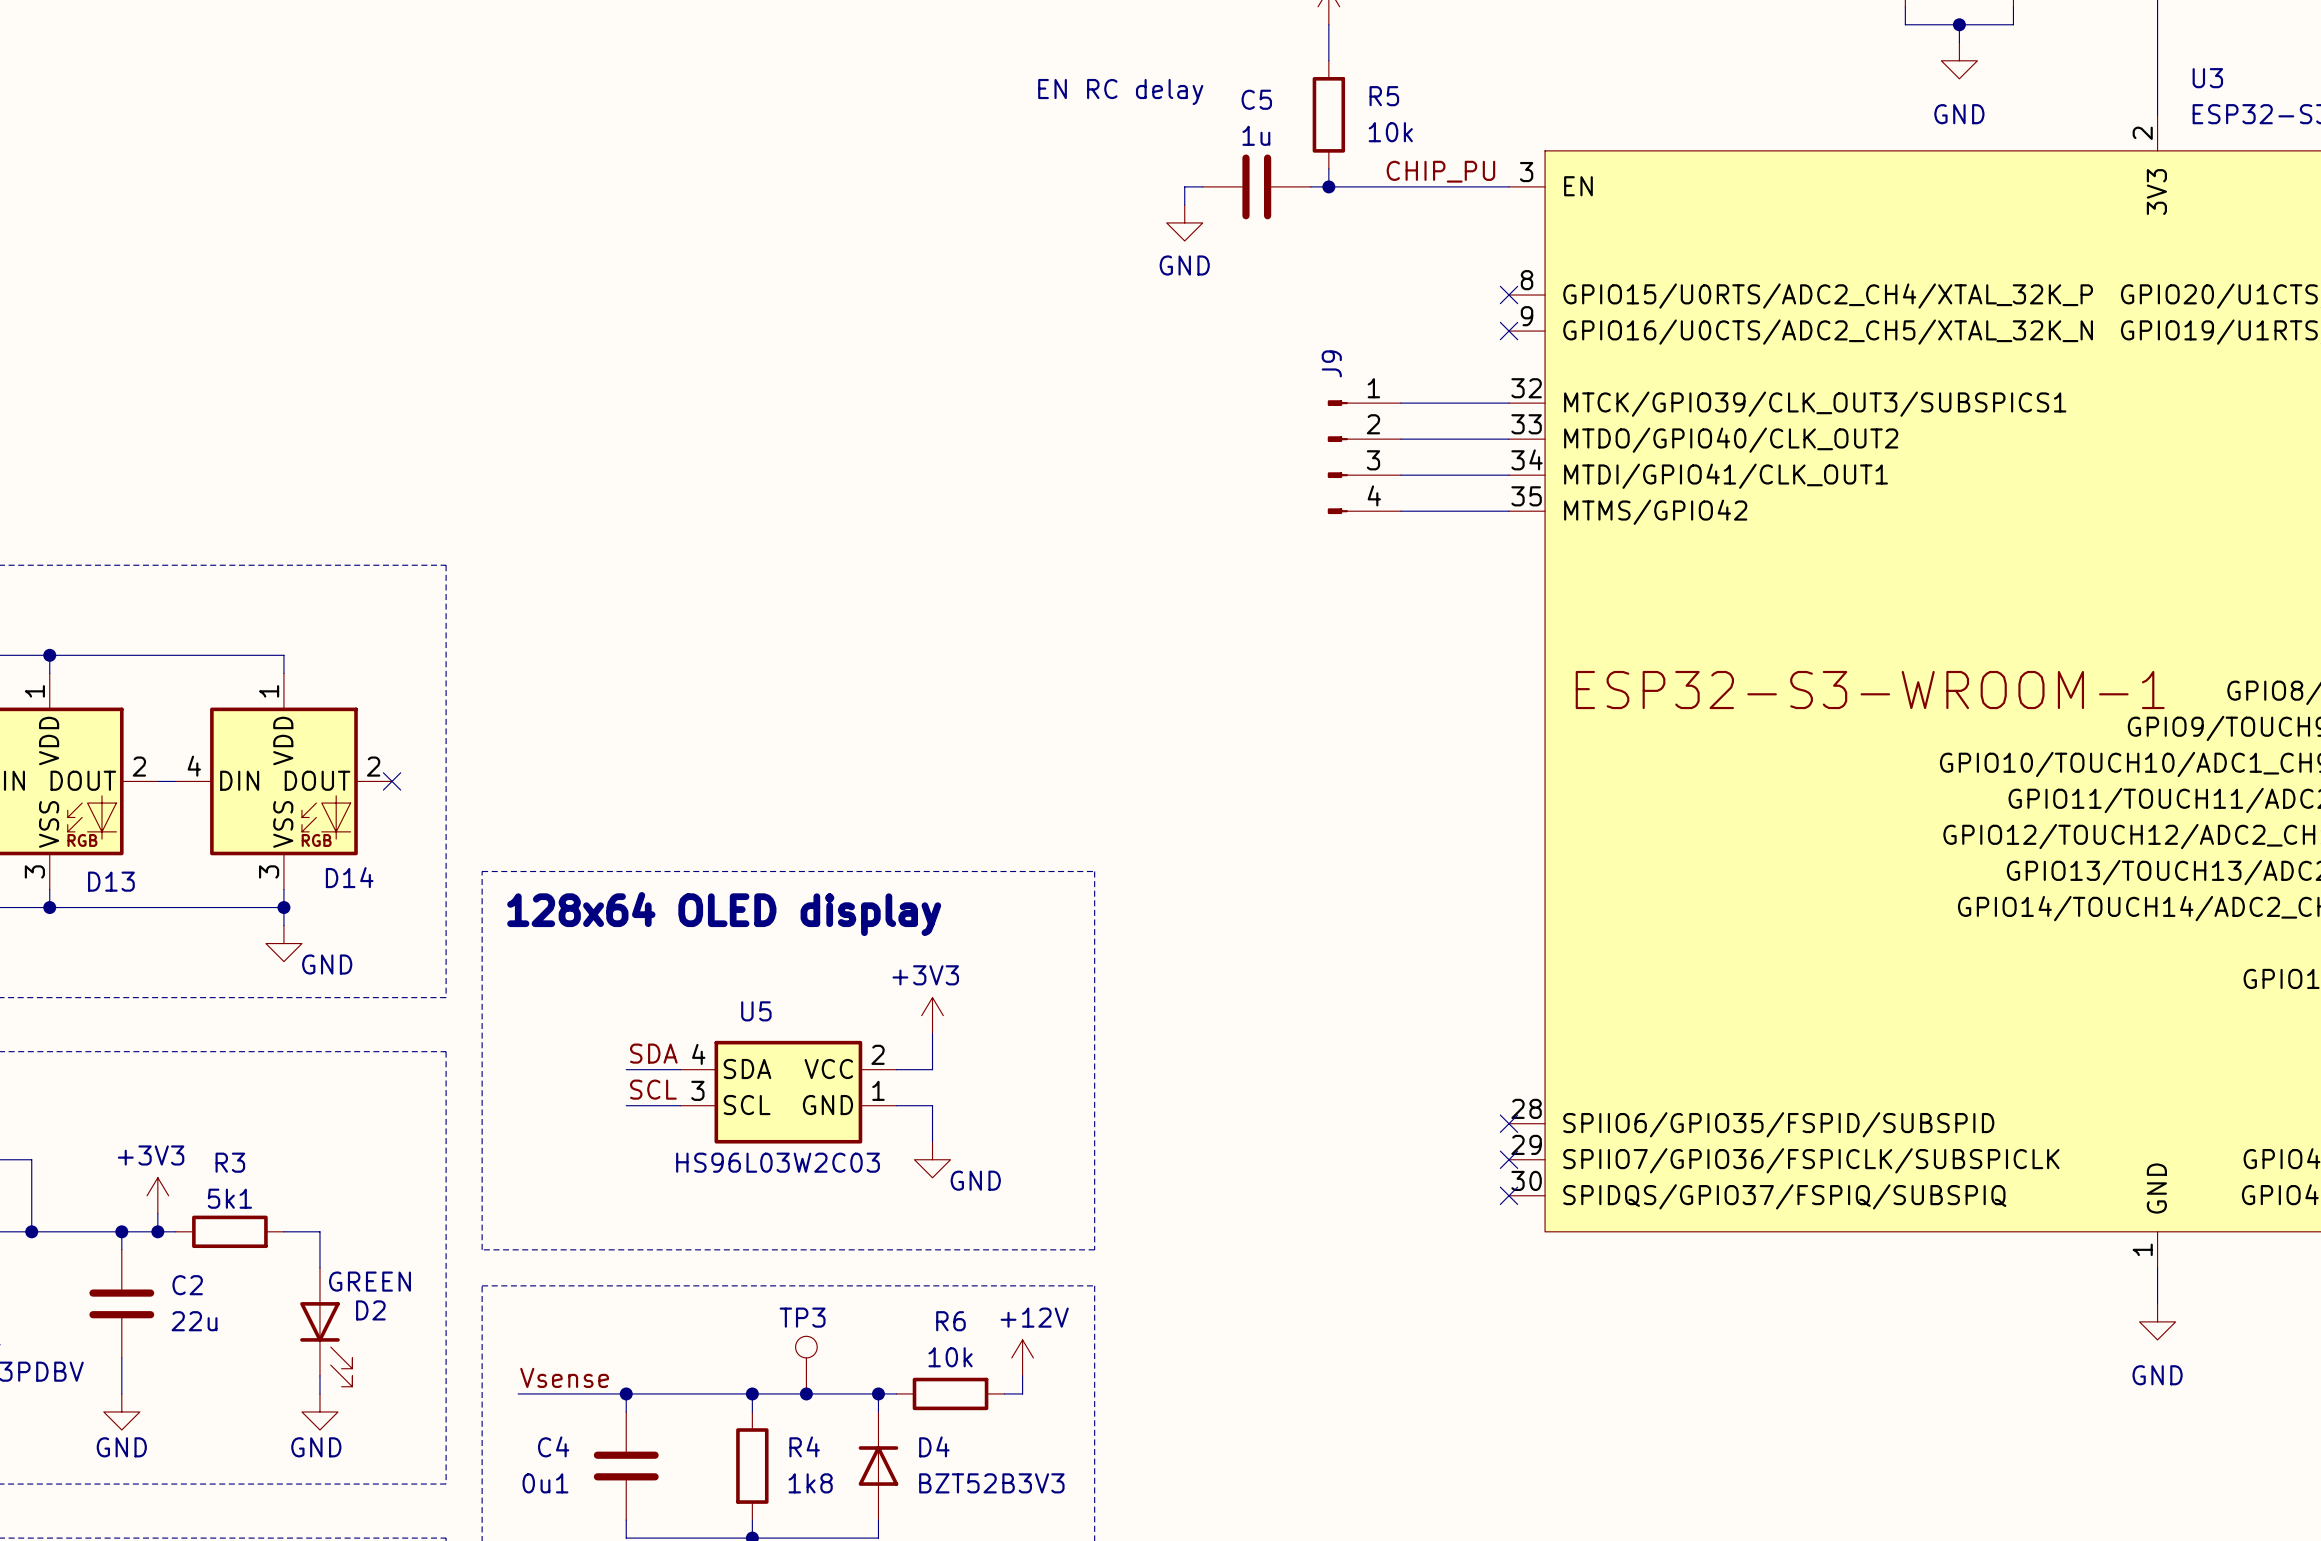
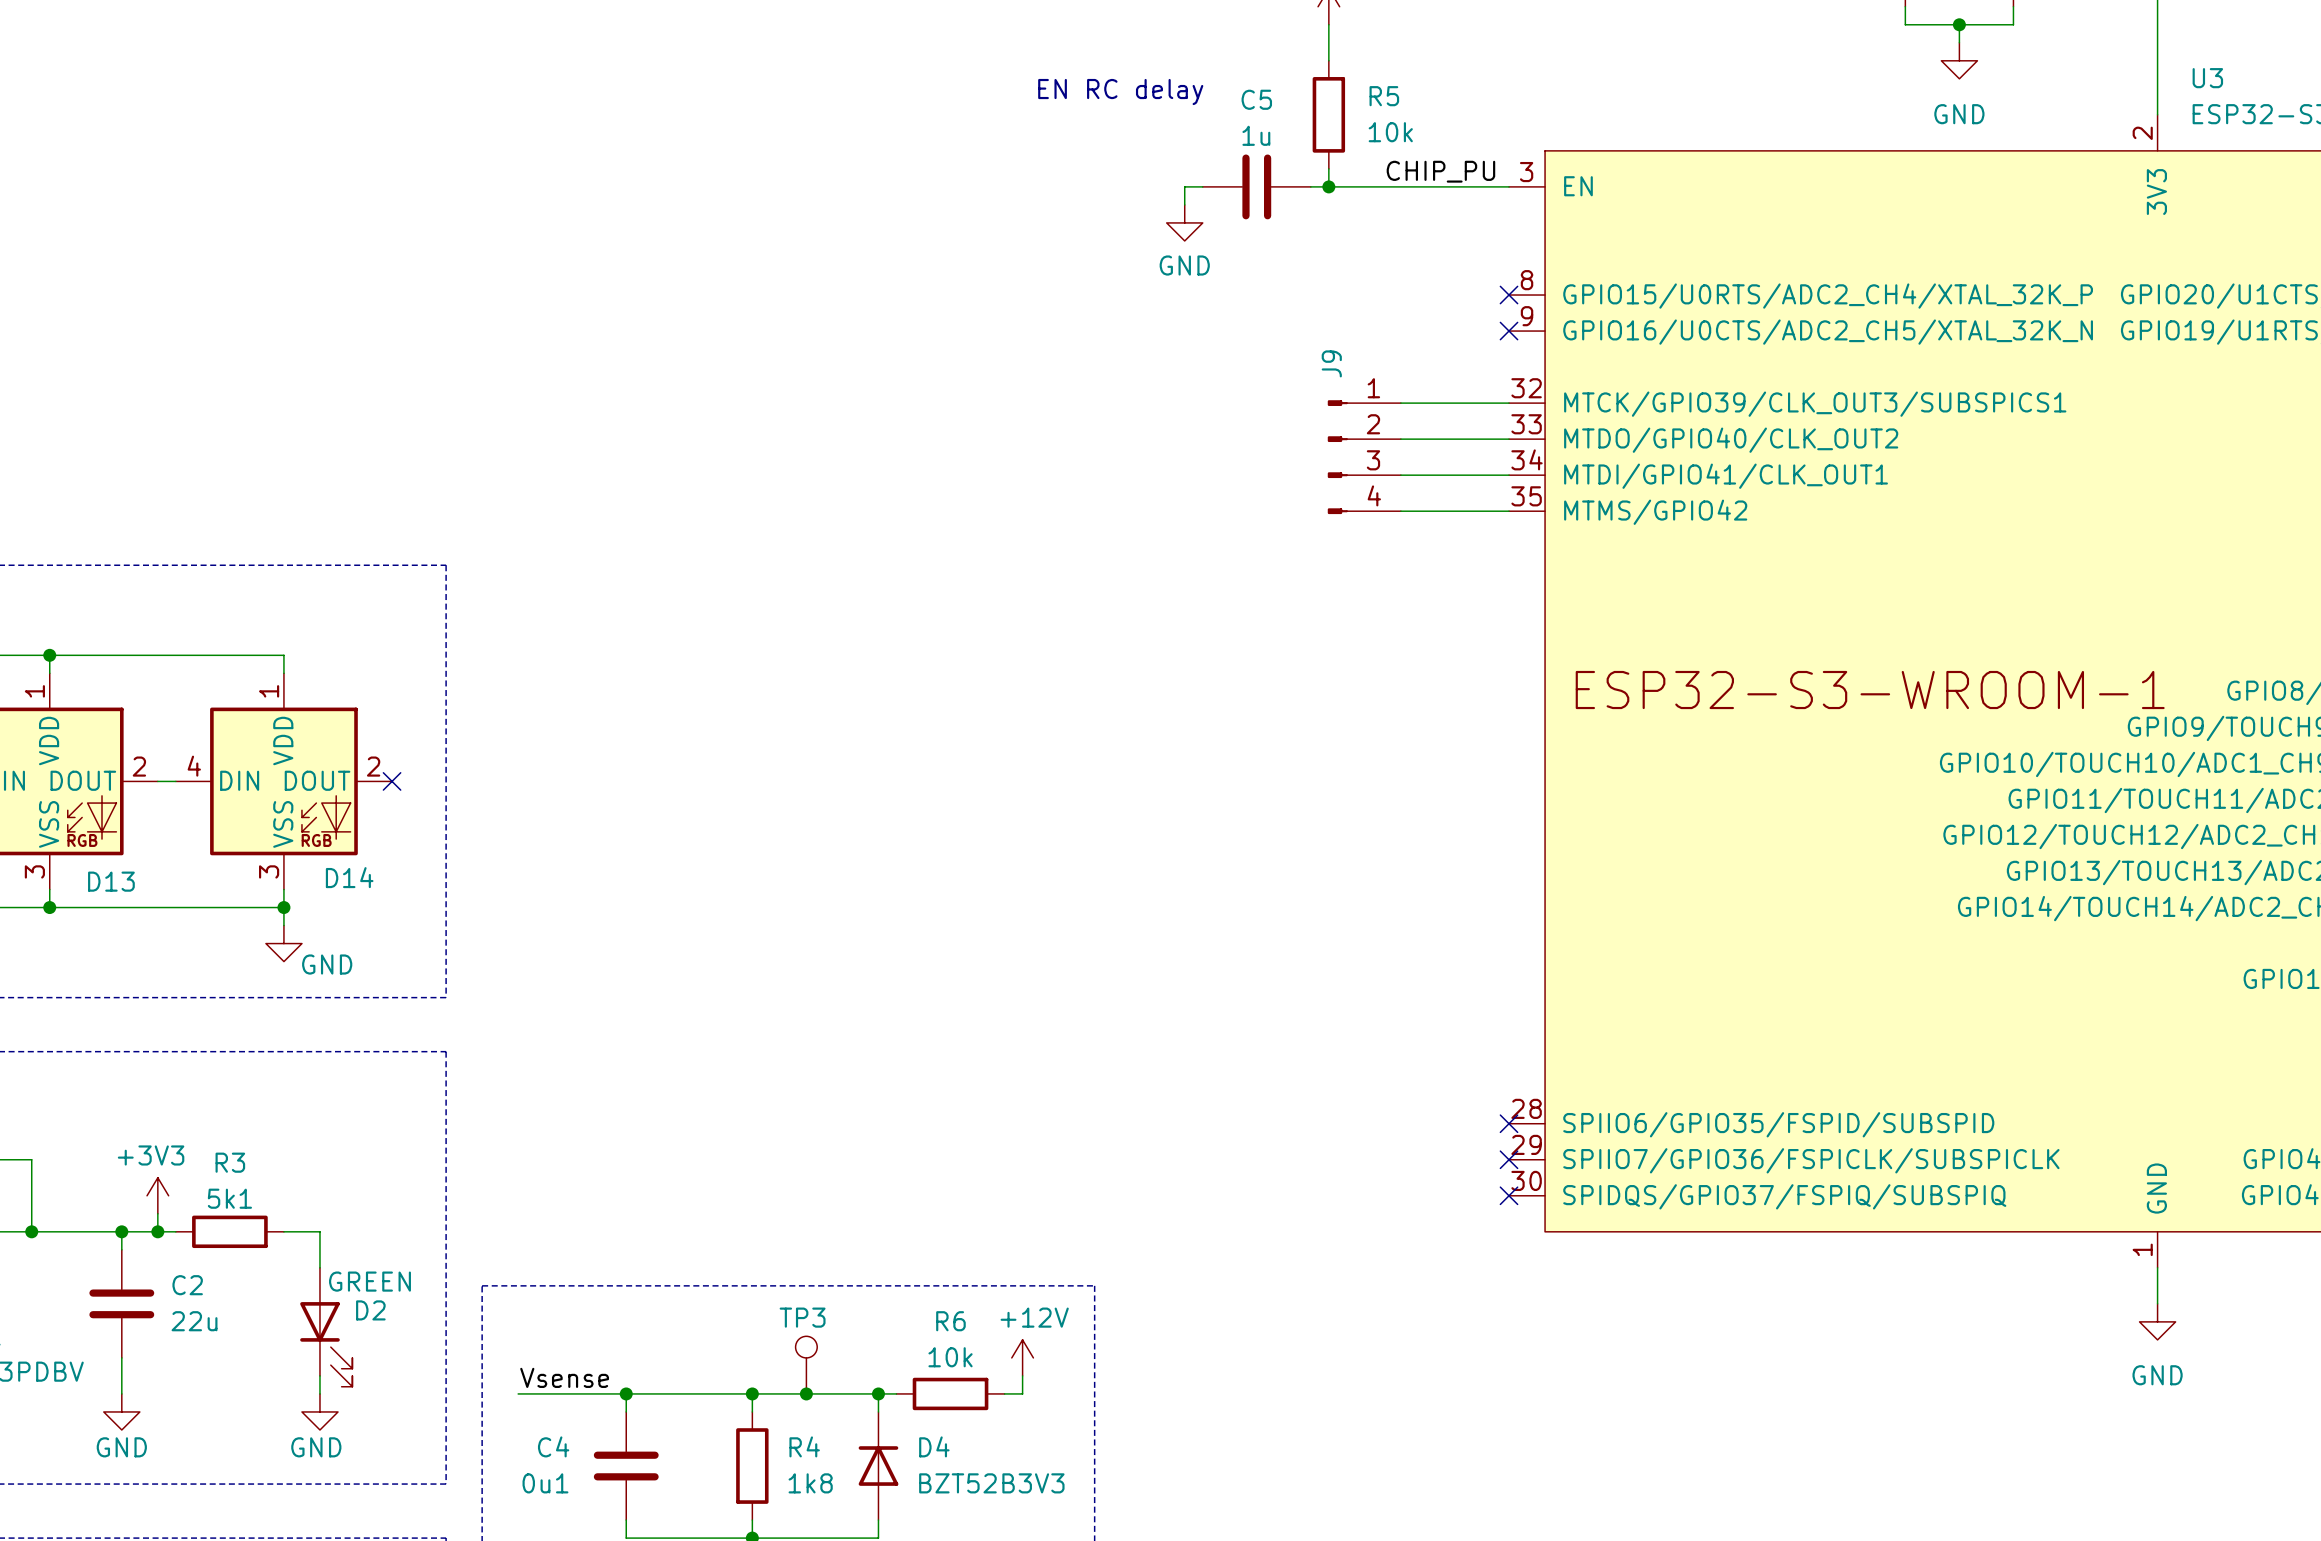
line: (482, 871) (1094, 871) (1094, 1249) (482, 1249) (482, 871) -> none
text: 128x64 OLED display (724, 914) -> none
power symbol: +3V3 (932, 1015) -> none
wire: (932, 1033) (932, 1069) (896, 1069) -> none
label: SDA (653, 1053) -> none
wire: (626, 1069) (680, 1069) -> none
label: SCL (653, 1089) -> none
U5: HS96L03W2C03 (788, 1092) -> none
wire: (626, 1105) (680, 1105) -> none
wire: (896, 1105) (932, 1105) (932, 1141) -> none
power symbol: GND (932, 1159) -> none

